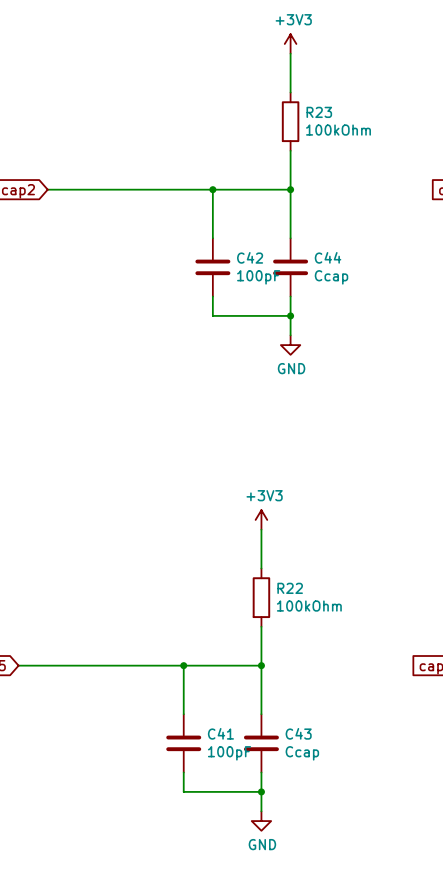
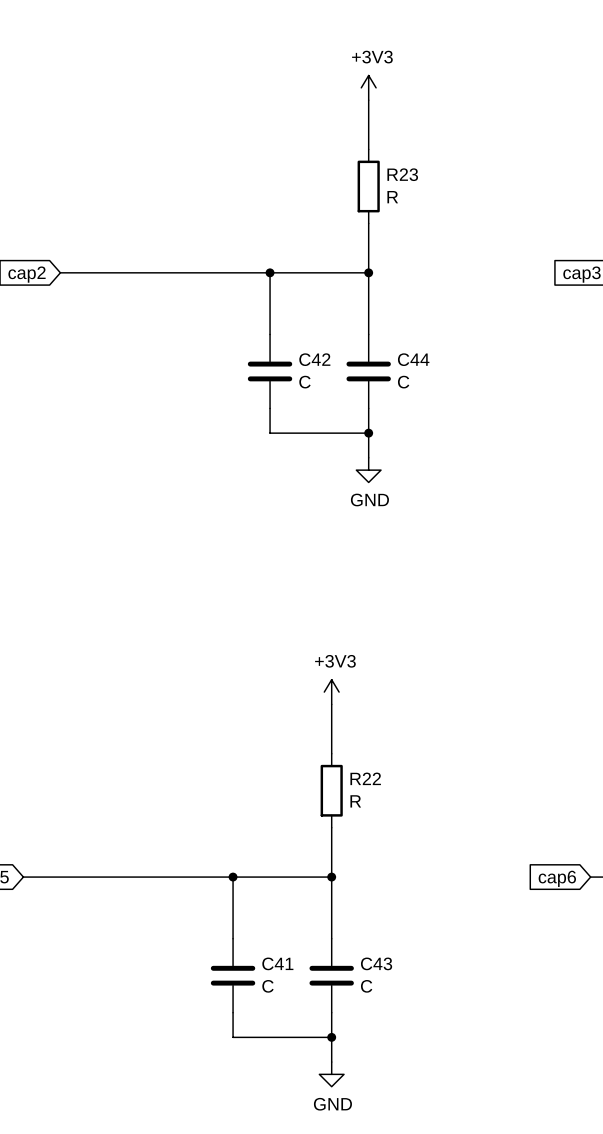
R23 value: 100kOhm (338, 130) -> R (392, 197)
C42 value: 100pF (258, 277) -> C (304, 382)
C44 value: Ccap (331, 277) -> C (403, 382)
R22 value: 100kOhm (309, 606) -> R (355, 801)
C41 value: 100pF (229, 753) -> C (267, 986)
C43 value: Ccap (302, 753) -> C (366, 986)

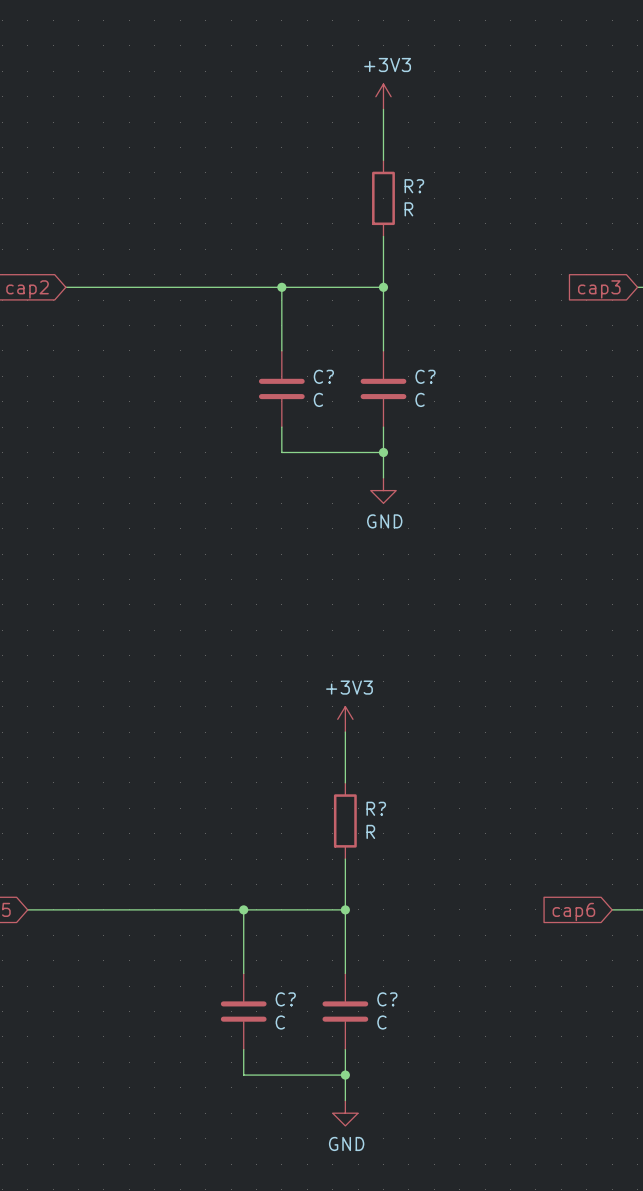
R23 name: R23 (402, 174) -> R? (414, 186)
C42 name: C42 (314, 359) -> C? (323, 376)
C44 name: C44 (413, 359) -> C? (425, 376)
R22 name: R22 (365, 778) -> R? (376, 808)
C41 name: C41 (277, 963) -> C? (285, 999)
C43 name: C43 (376, 963) -> C? (387, 999)

